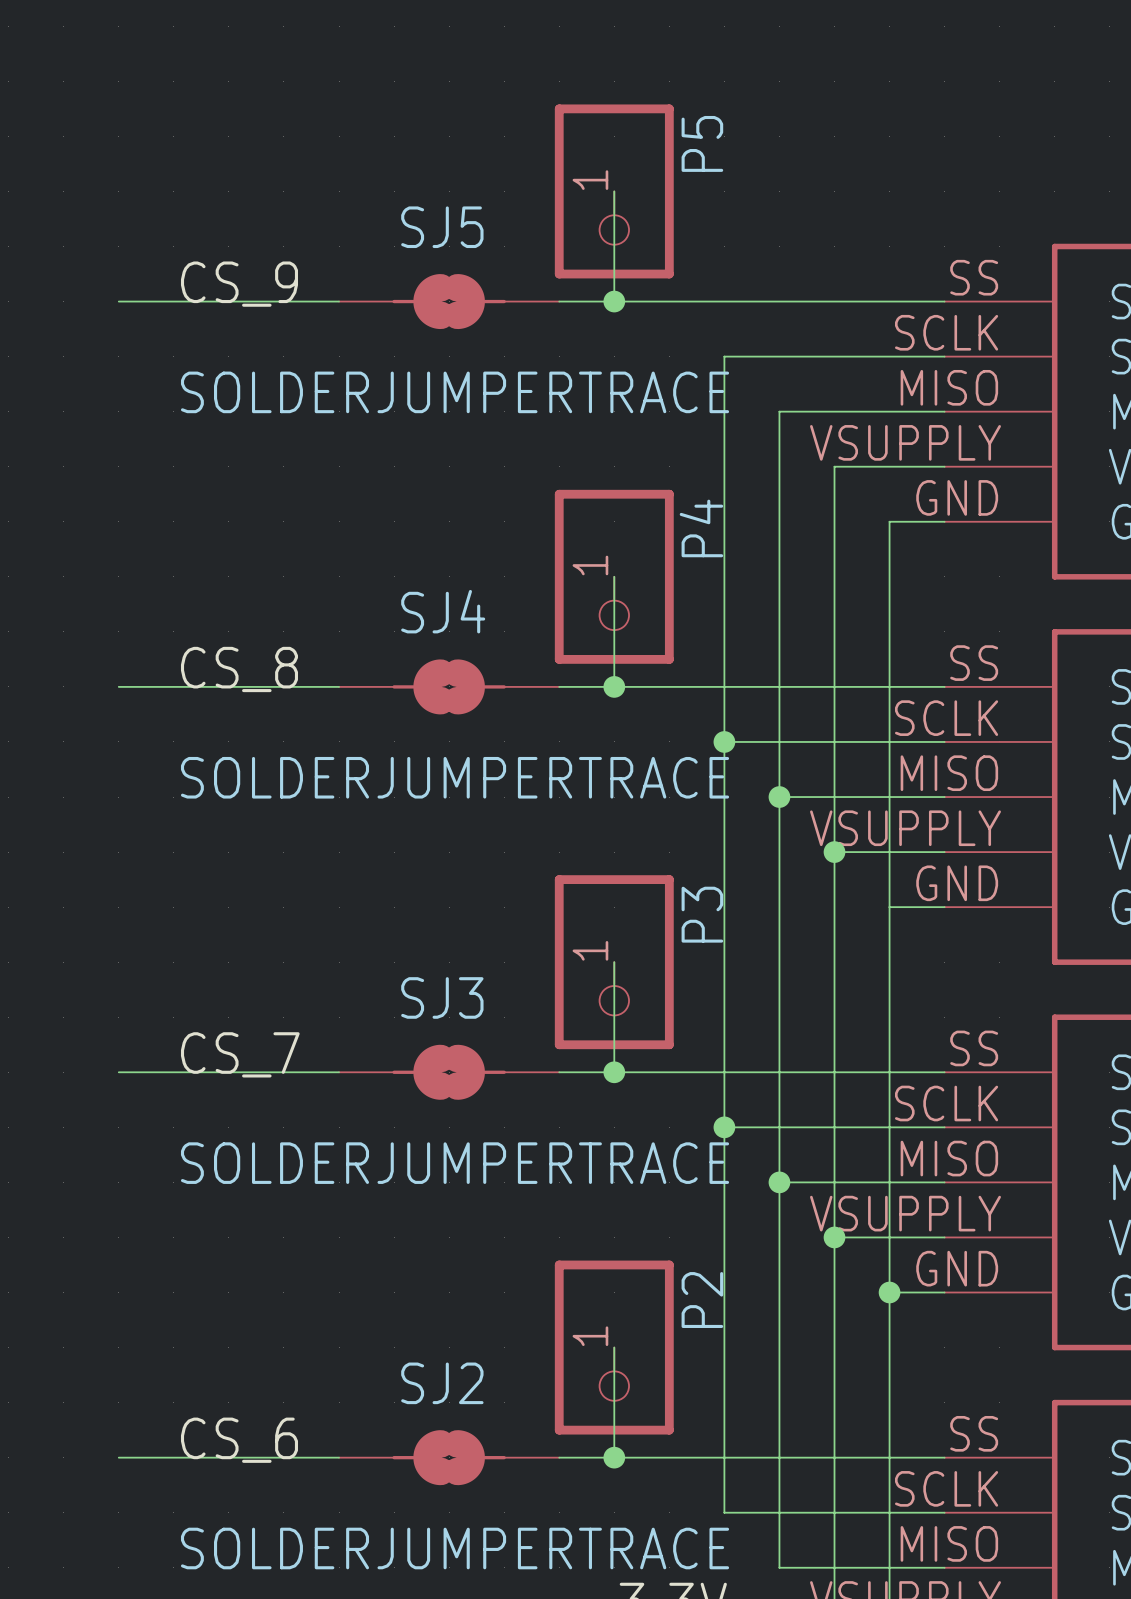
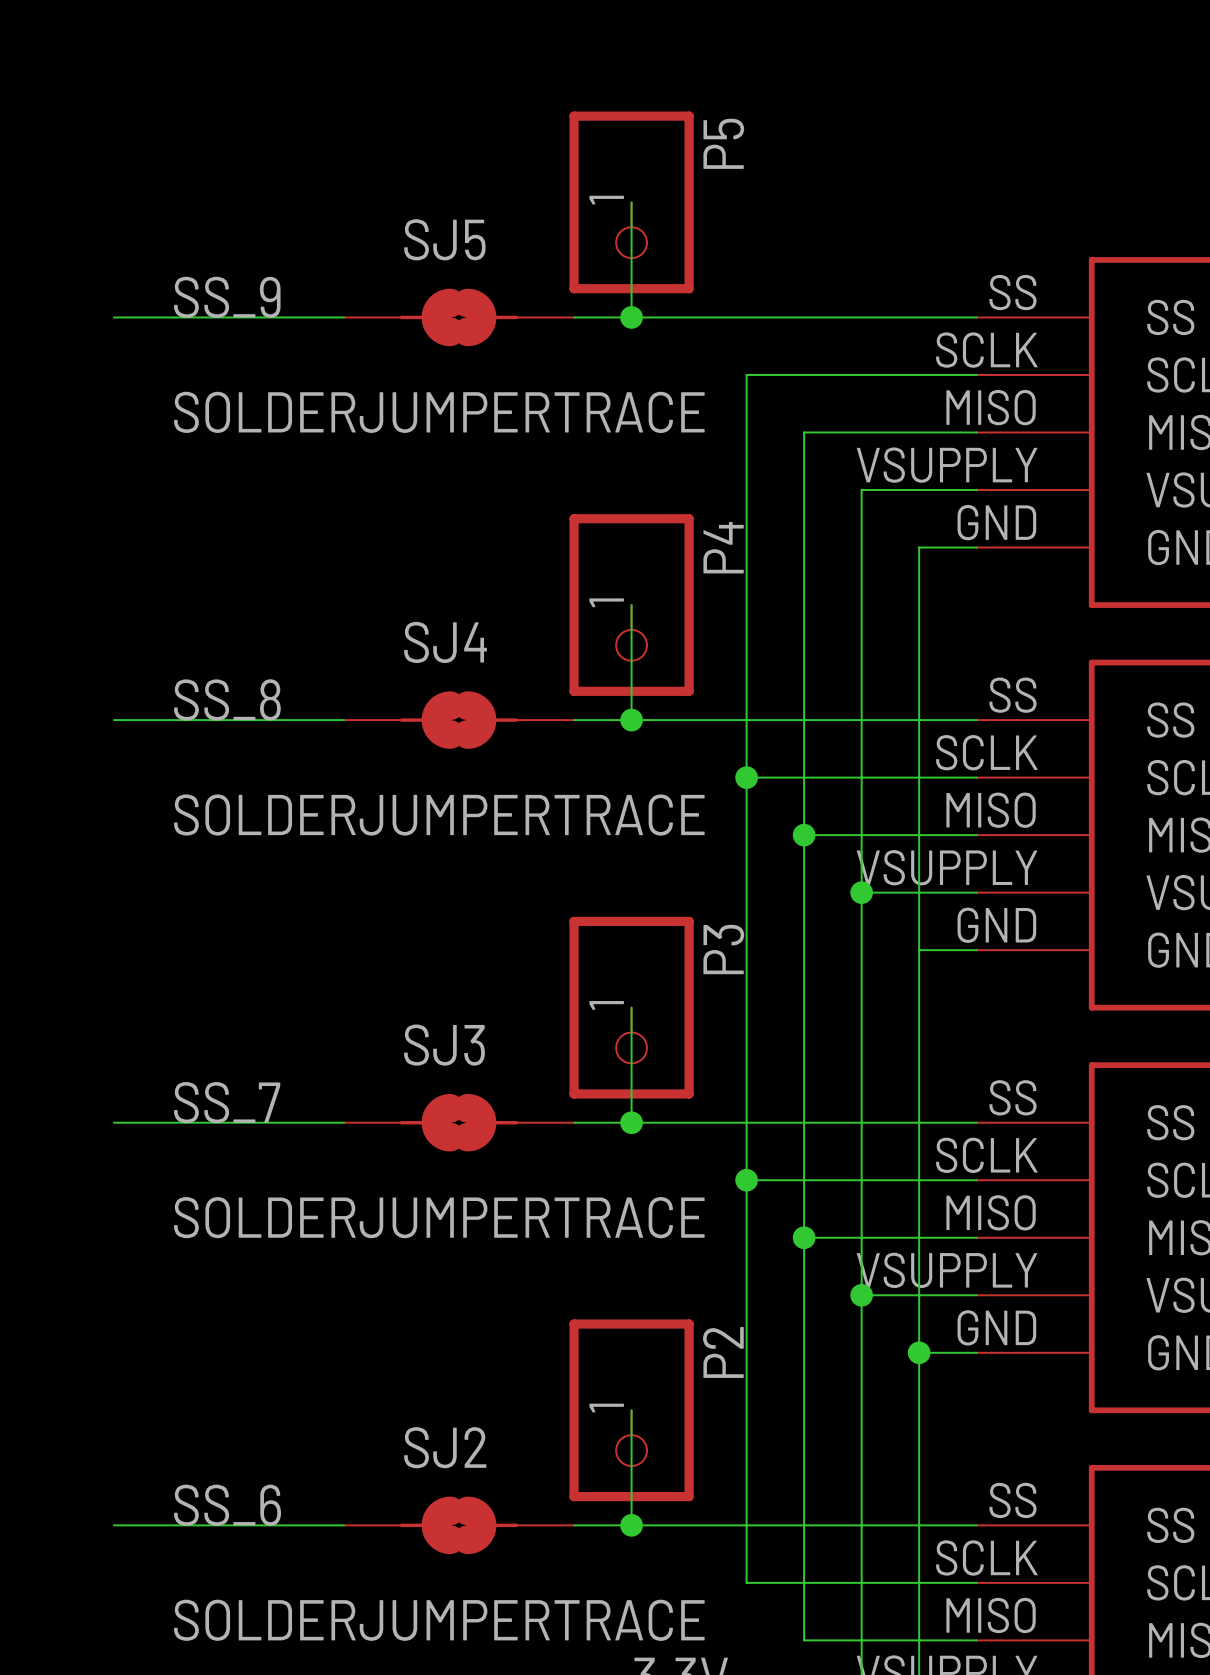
label: CS_9 (239, 284) -> SS_9 (227, 297)
label: CS_8 (239, 669) -> SS_8 (227, 699)
label: CS_7 (240, 1054) -> SS_7 (227, 1102)
label: CS_6 (239, 1440) -> SS_6 (227, 1505)

